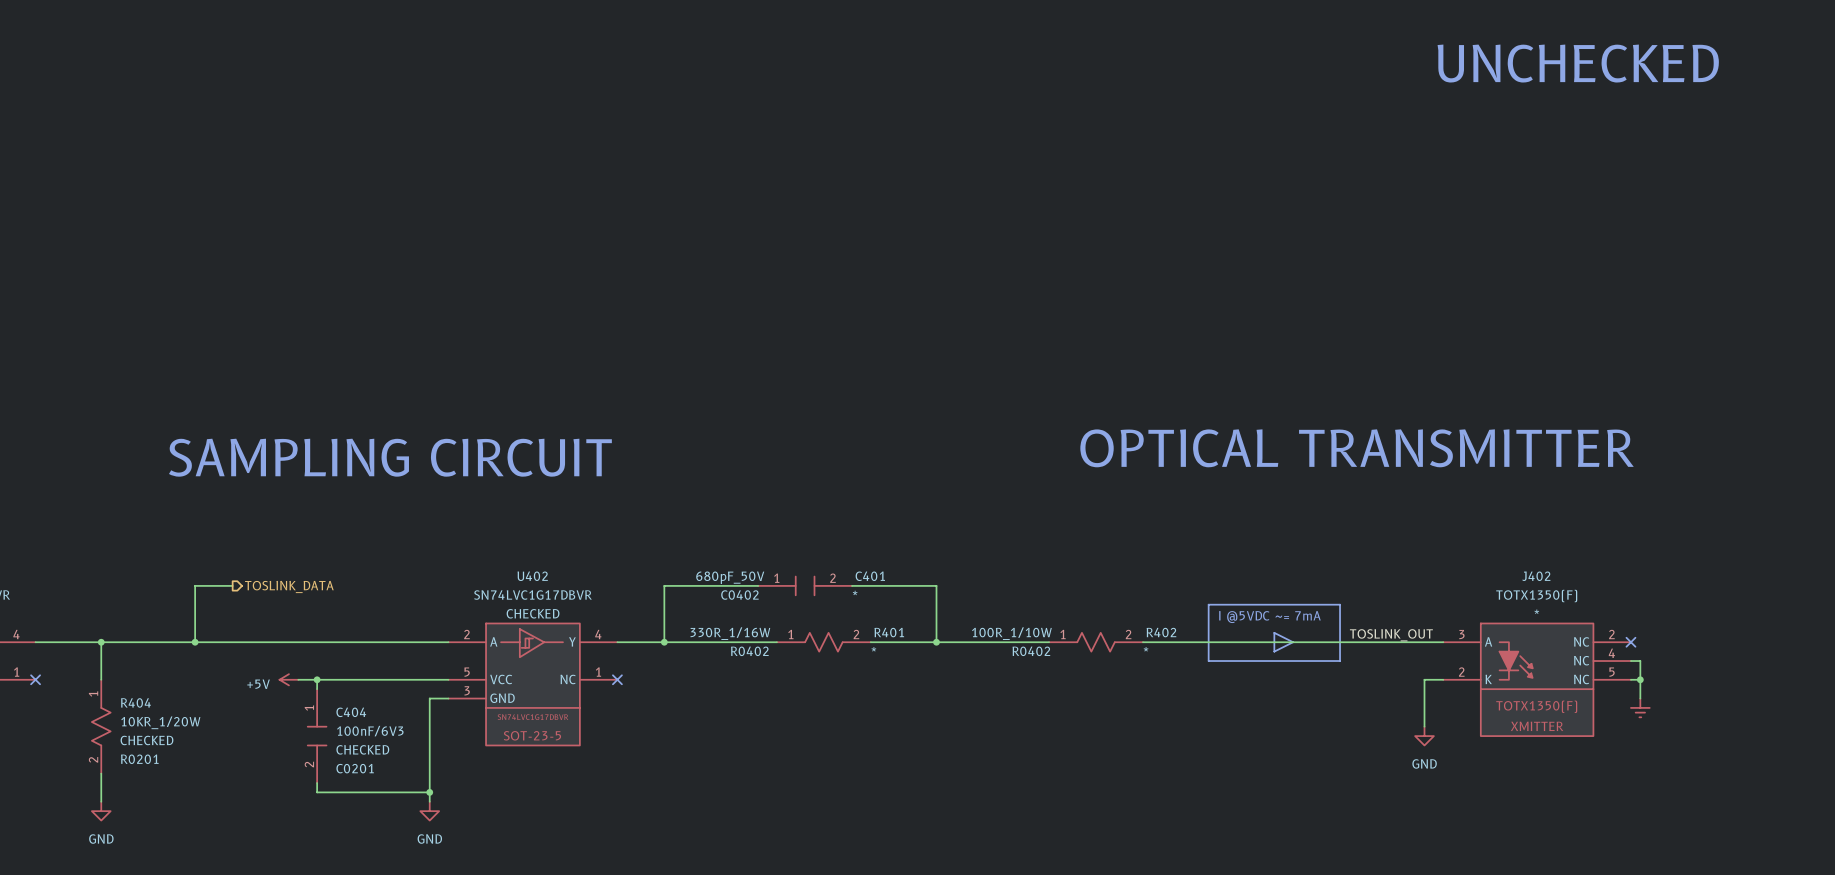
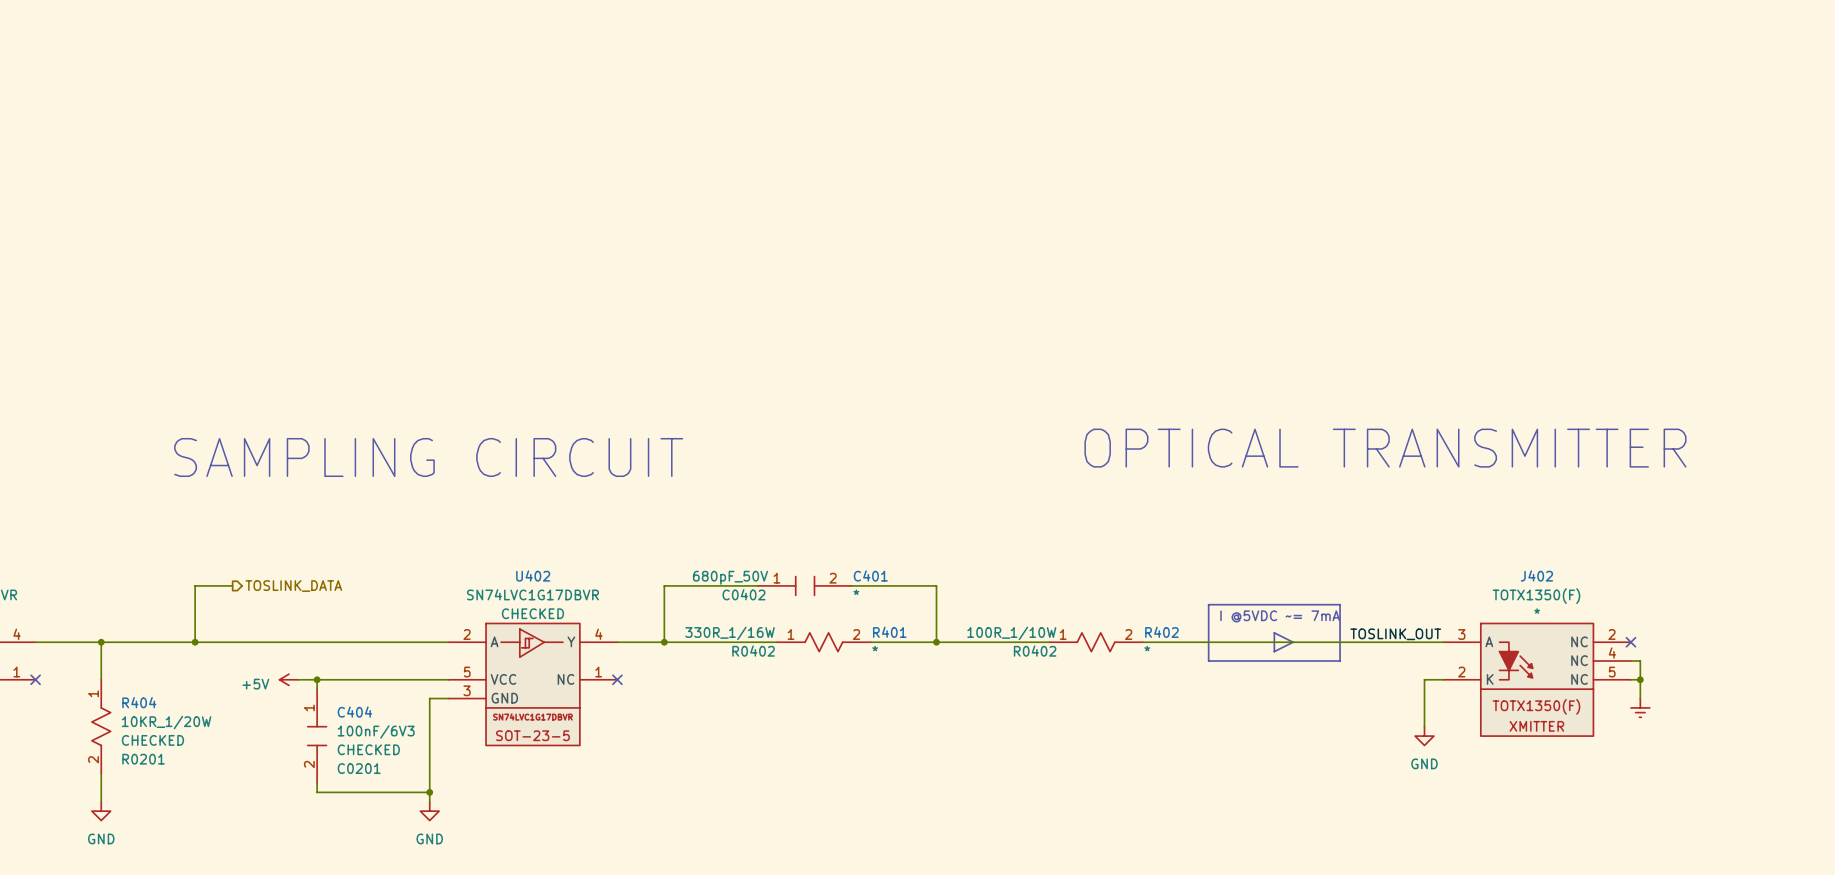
text: UNCHECKED (1578, 63) -> none

